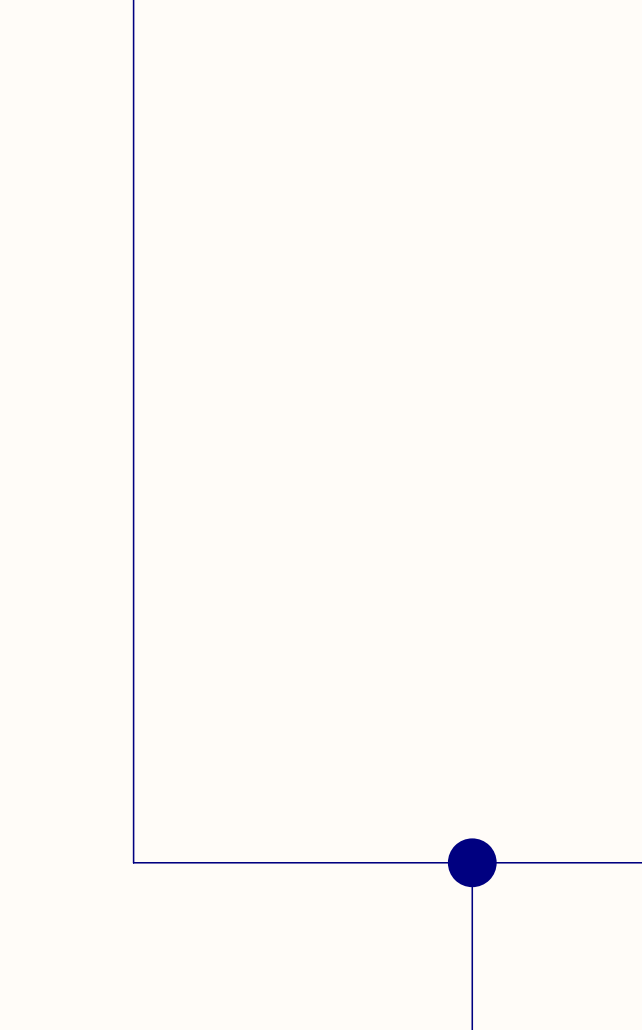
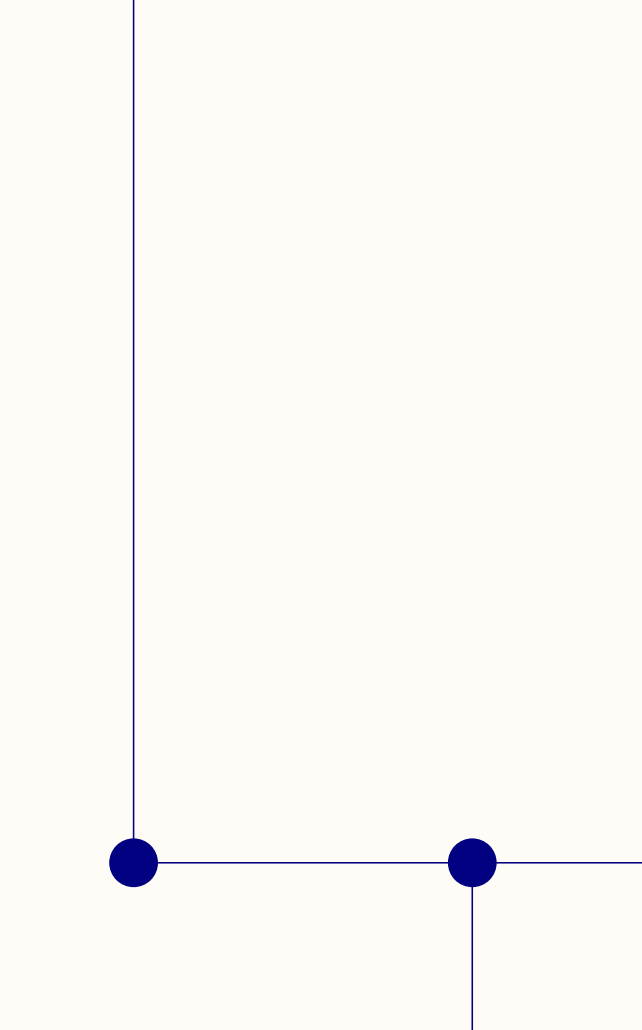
junction: none -> (133, 862)

